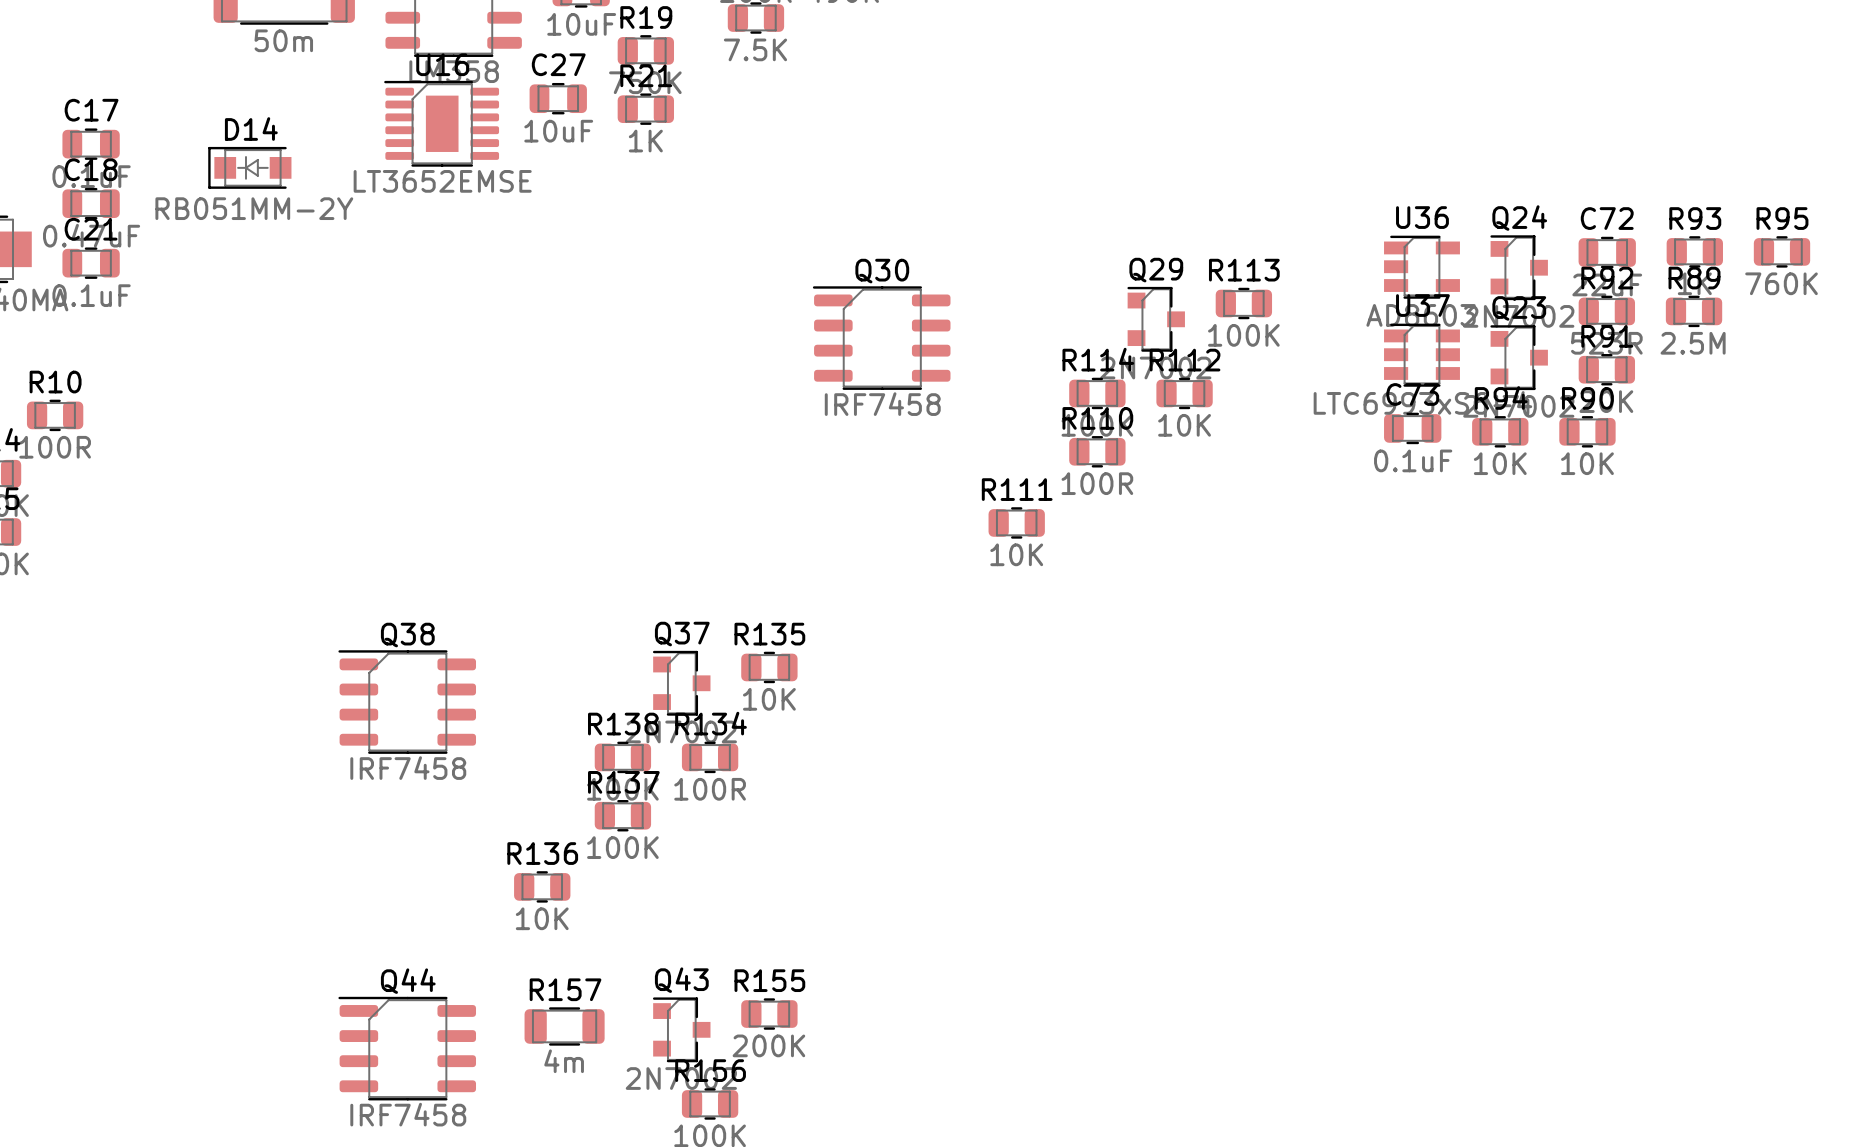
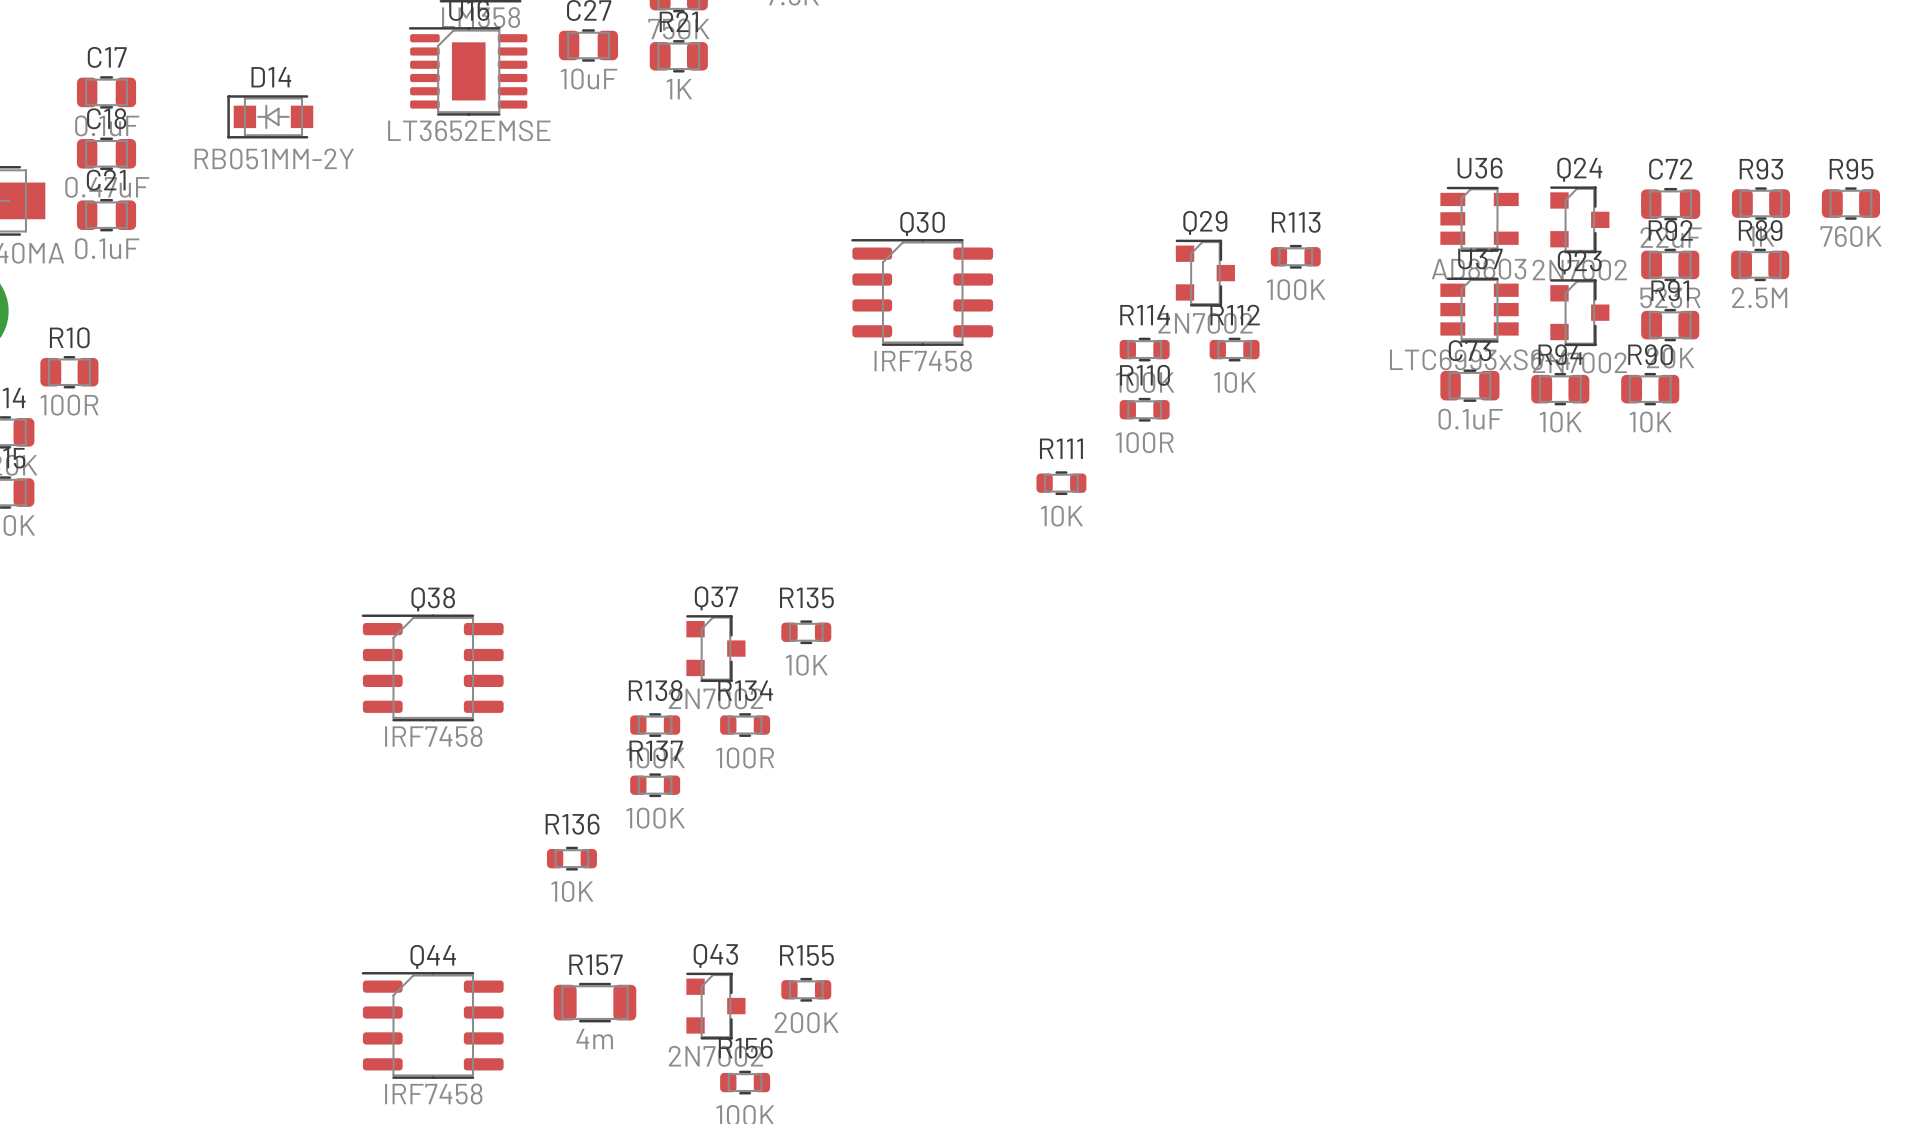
R113 footprint: [1215, 287, 1273, 320] -> [1270, 244, 1321, 269]
R114 footprint: [1069, 377, 1126, 410] -> [1119, 337, 1170, 362]
R112 footprint: [1156, 377, 1213, 410] -> [1209, 337, 1260, 362]
R110 footprint: [1069, 436, 1126, 468] -> [1119, 397, 1170, 422]
R111 footprint: [988, 507, 1045, 539] -> [1036, 471, 1087, 496]
R135 footprint: [741, 651, 798, 684] -> [781, 620, 832, 645]
R138 footprint: [594, 741, 652, 774] -> [630, 713, 681, 737]
R134 footprint: [681, 741, 739, 774] -> [720, 713, 771, 737]
R137 footprint: [594, 800, 652, 832] -> [630, 773, 681, 798]
R136 footprint: [514, 871, 571, 903] -> [546, 846, 597, 871]
R155 footprint: [741, 998, 798, 1030] -> [781, 977, 832, 1002]
R156 footprint: [681, 1088, 739, 1120] -> [720, 1070, 771, 1095]

